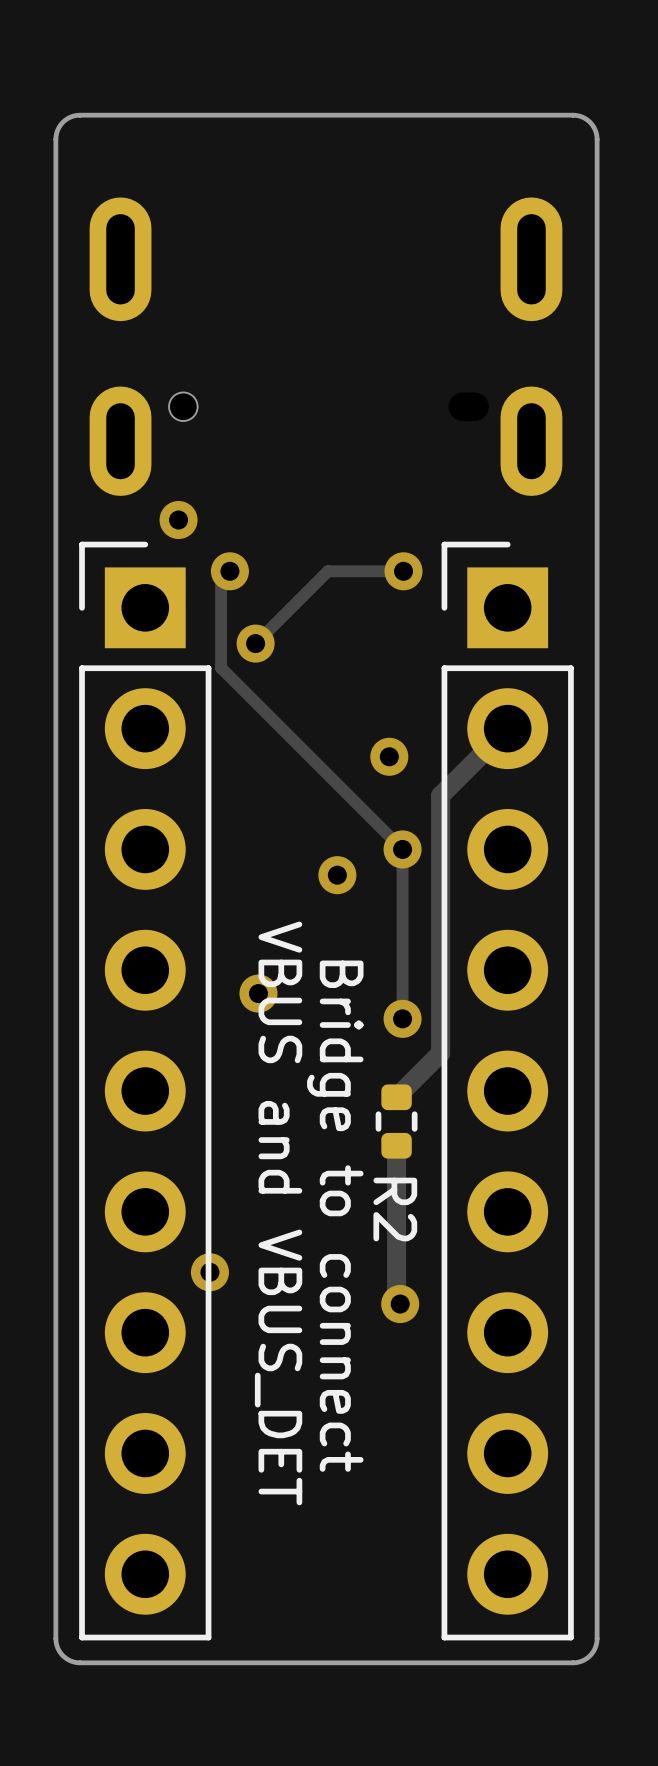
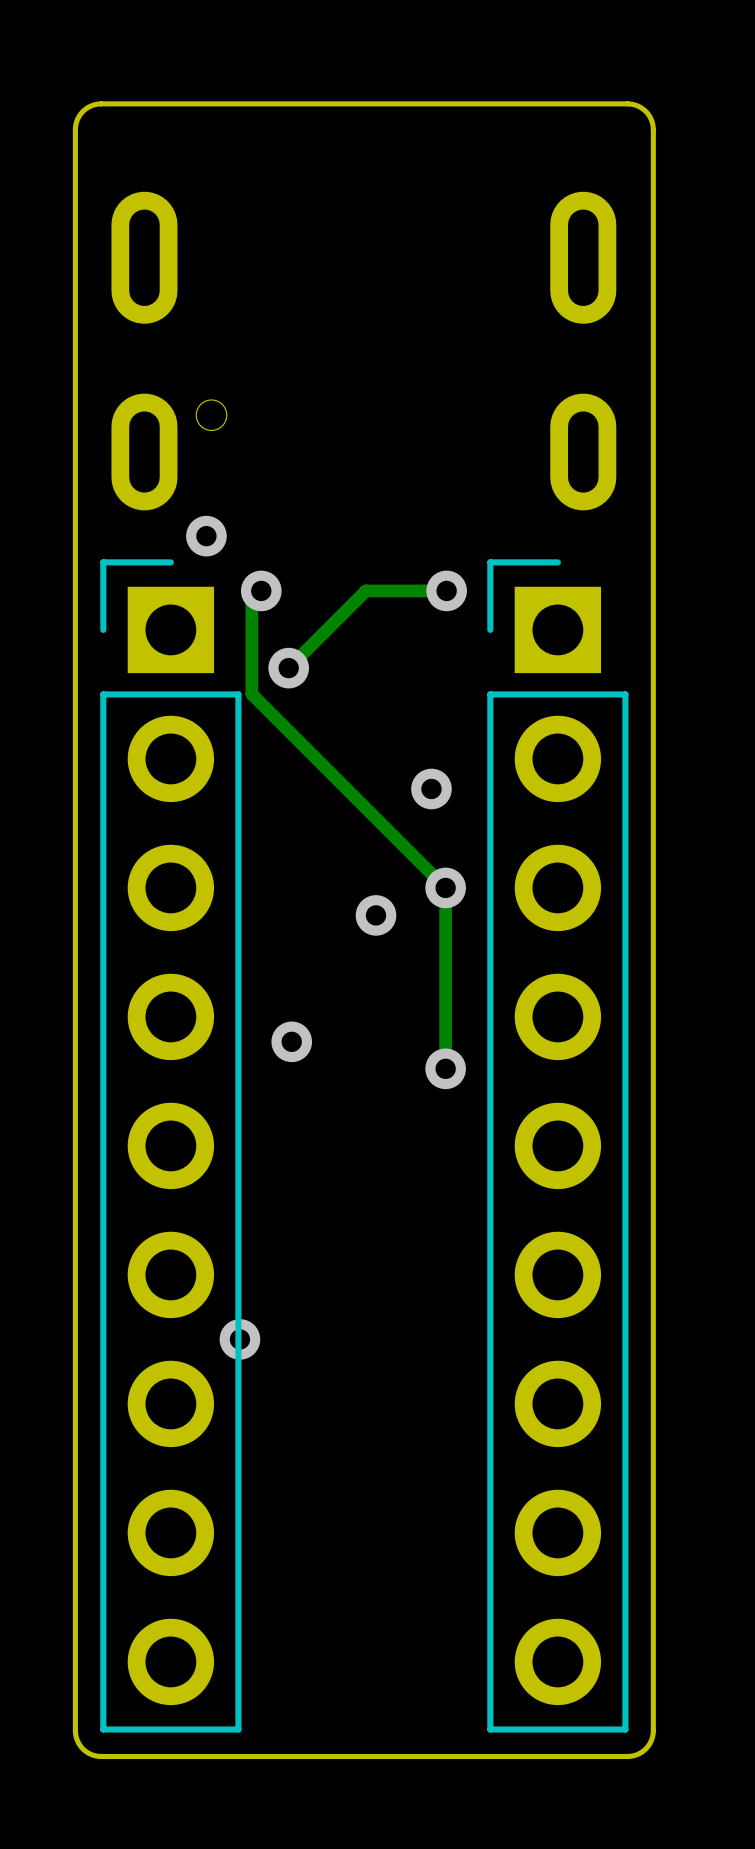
track: (507, 728) (440, 795) (440, 1053) (396, 1097) -> none
R2: (396, 1121) -> none
track: (396, 1145) (396, 1300) (400, 1304) -> none
text: VBUS and VBUS_DET (278, 1213) -> none
text: Bridge to connect (335, 1216) -> none
via: (400, 1304) -> none

